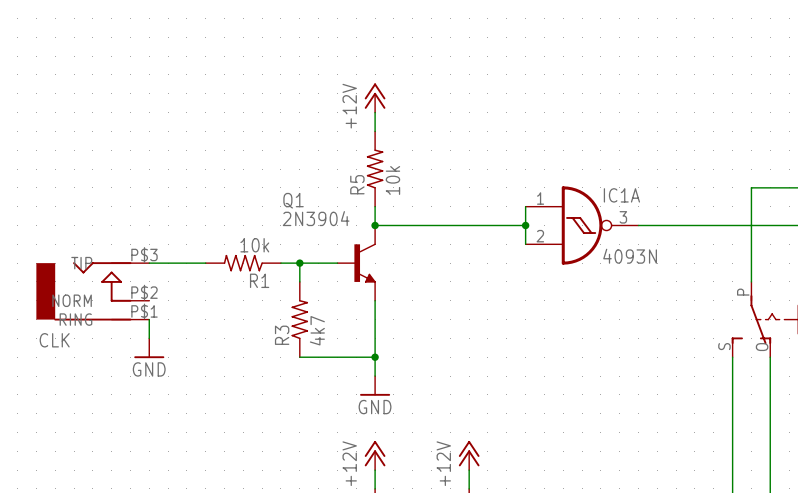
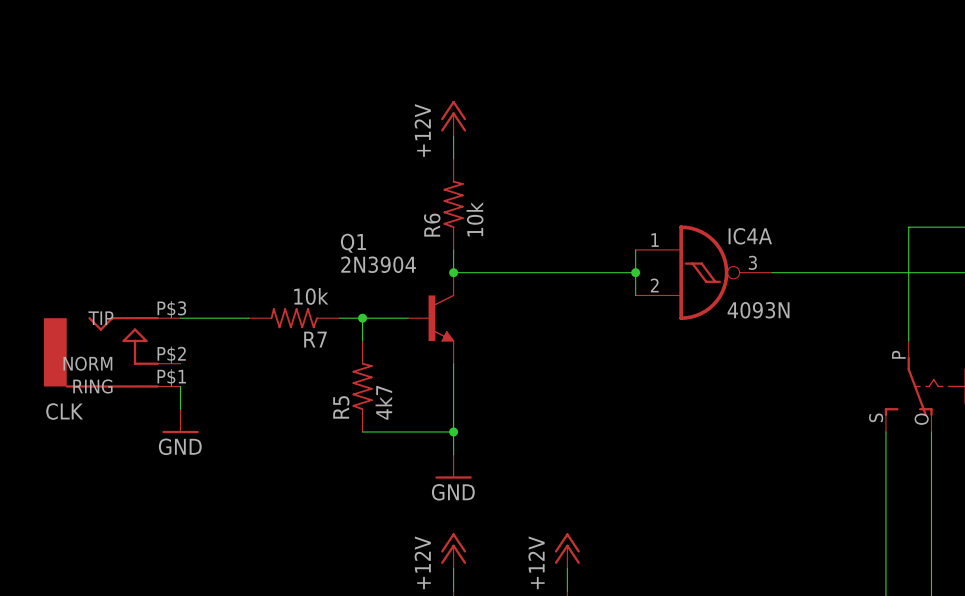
R5 name: R5 (357, 184) -> R6 (432, 225)
IC1A name: IC1A (621, 195) -> IC4A (750, 236)
R1 name: R1 (259, 280) -> R7 (315, 339)
R3 name: R3 (282, 335) -> R5 (341, 407)

